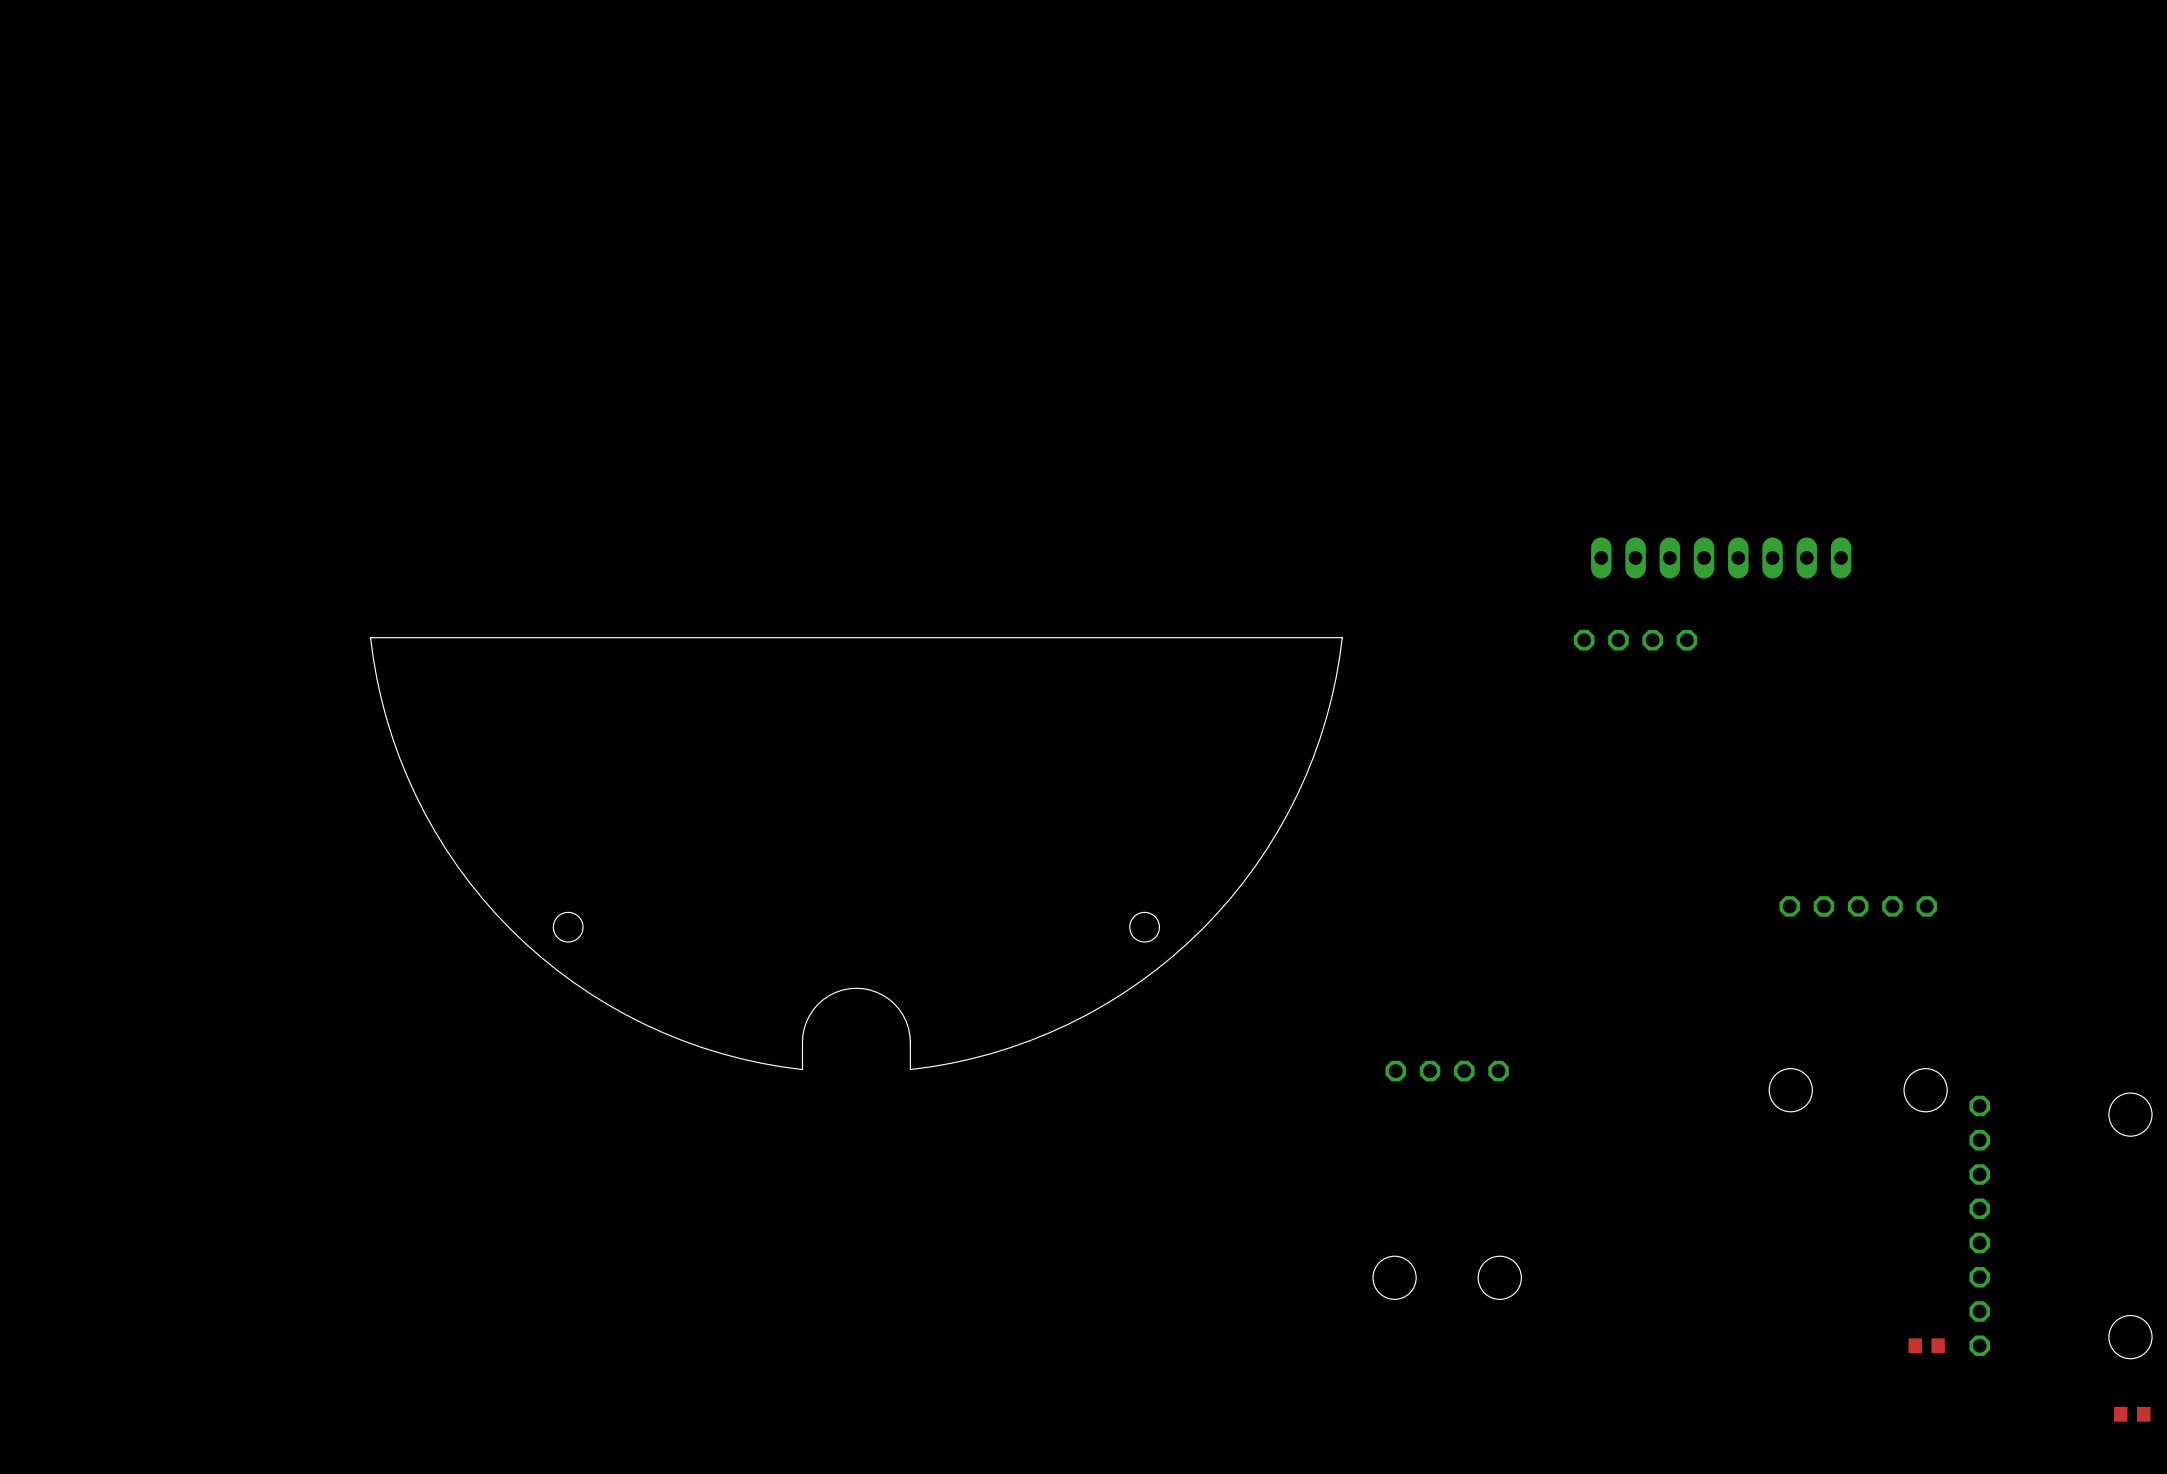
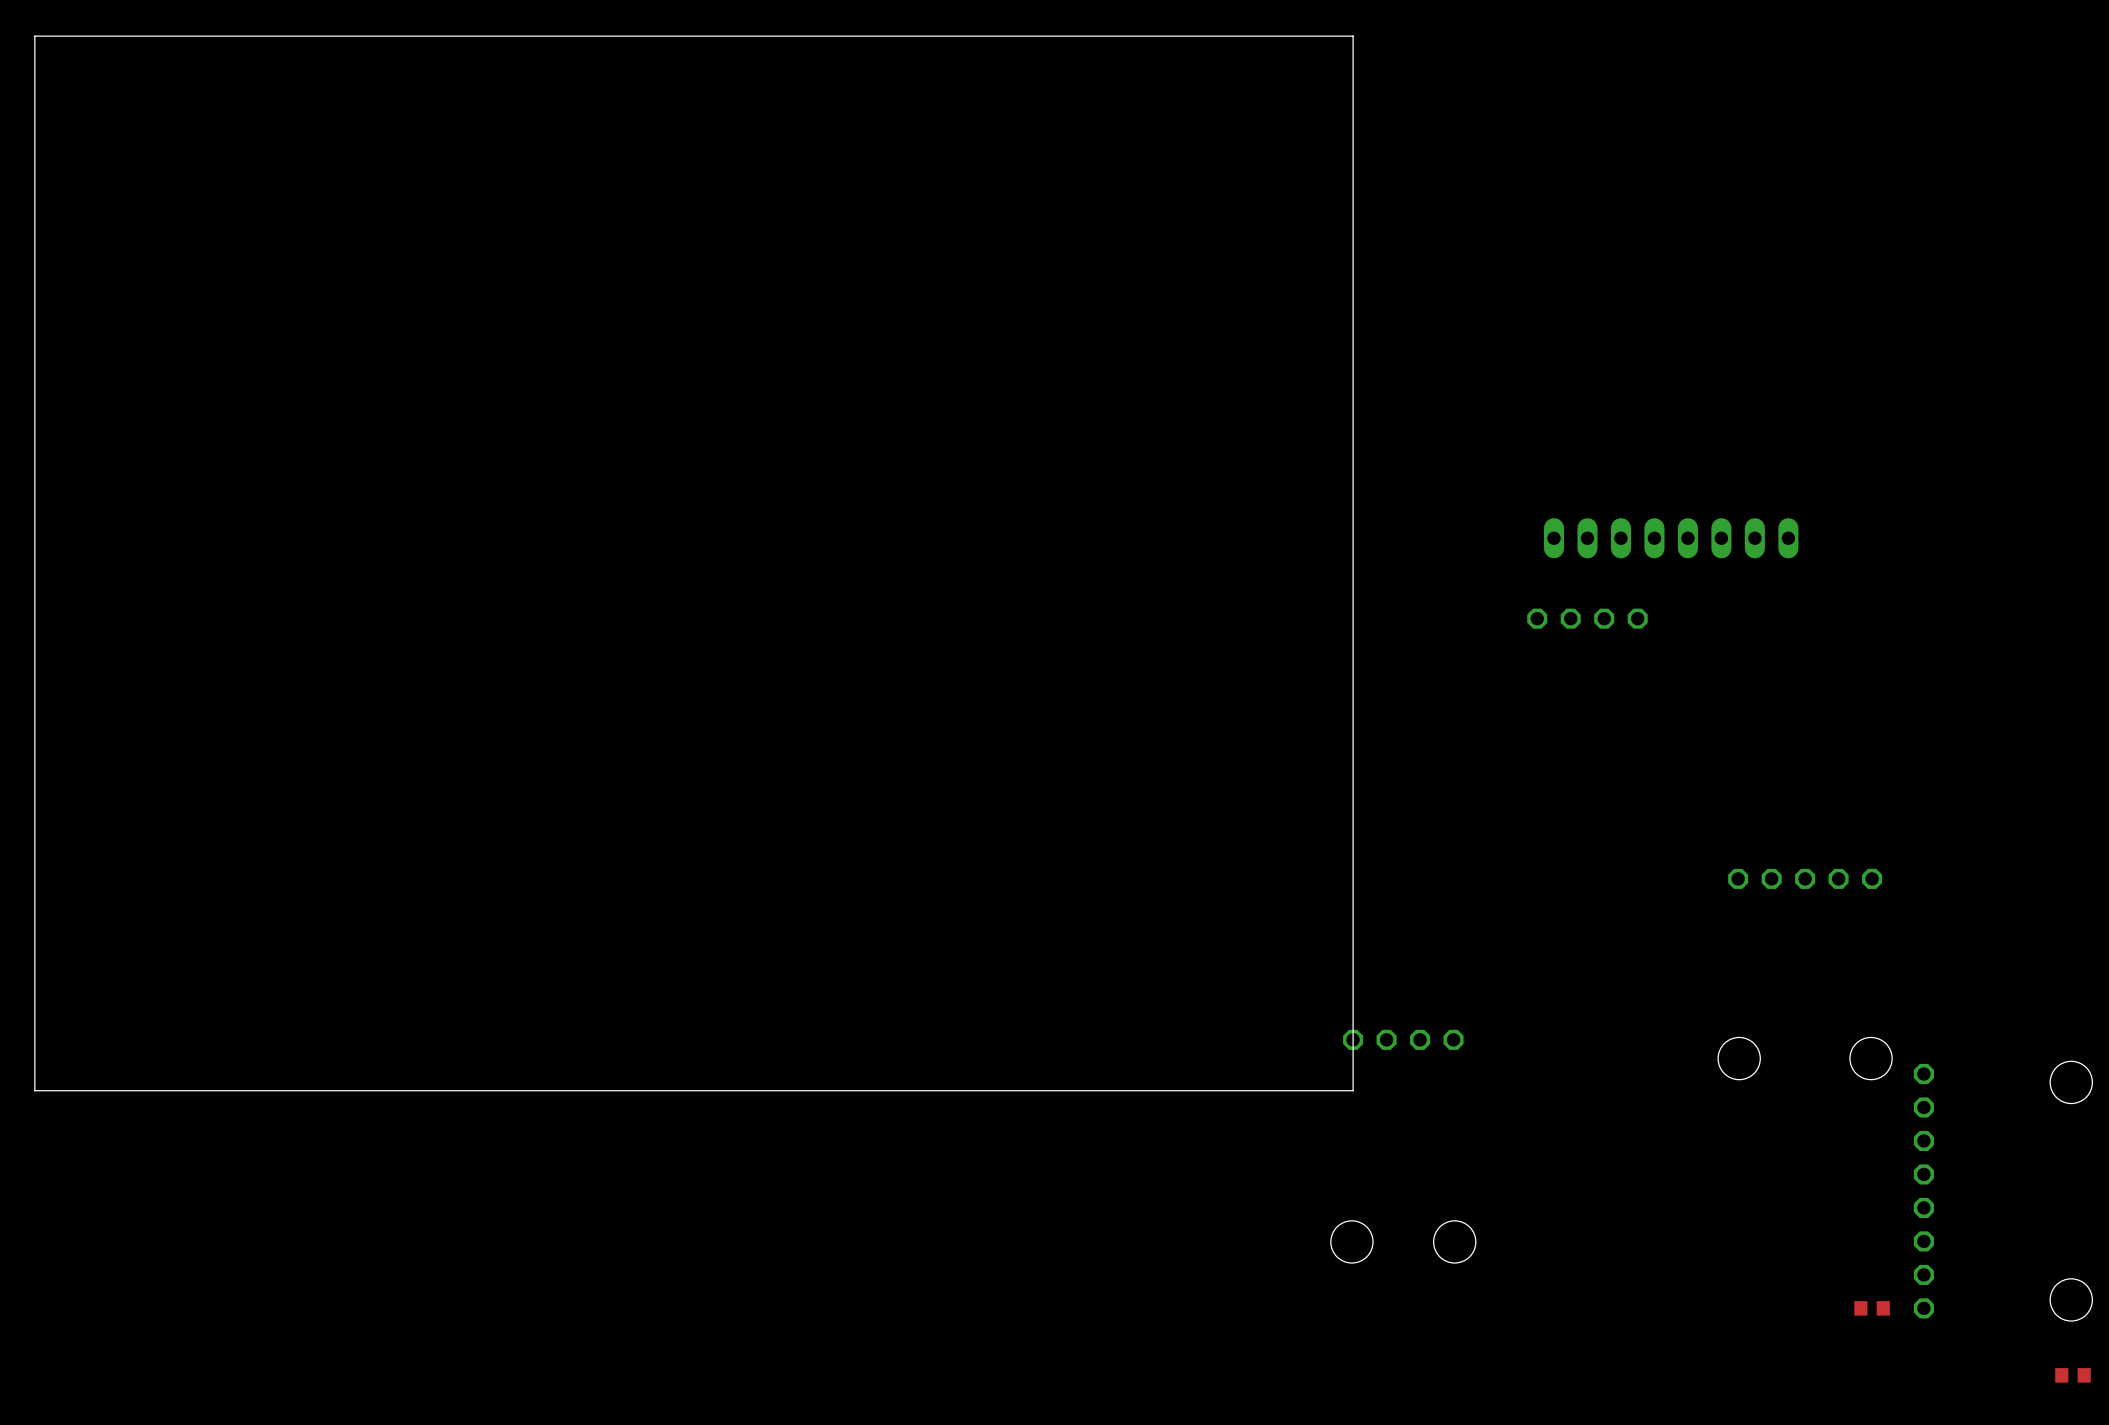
board edge: none -> (1353, 36) (34, 36) (34, 1090) (1353, 1090) (1353, 36)
board edge: (1342, 637) (370, 637) (376, 678) (386, 718) (399, 757) (415, 795) (435, 831) (457, 866) (482, 899) (510, 929) (541, 957) (573, 982) (608, 1004) (644, 1024) (682, 1040) (721, 1053) (761, 1063) (802, 1069) (802, 1035) (809, 1015) (823, 999) (842, 990) (856, 988) (870, 990) (883, 995) (899, 1009) (906, 1021) (909, 1035) (910, 1069) (971, 1058) (1030, 1040) (1086, 1015) (1122, 994) (1155, 970) (1202, 929) (1229, 899) (1266, 849) (1287, 813) (1305, 776) (1320, 738) (1335, 678) (1342, 637) -> none
round board edge: [553, 912, 584, 943] -> none
round board edge: [1129, 912, 1160, 943] -> none

